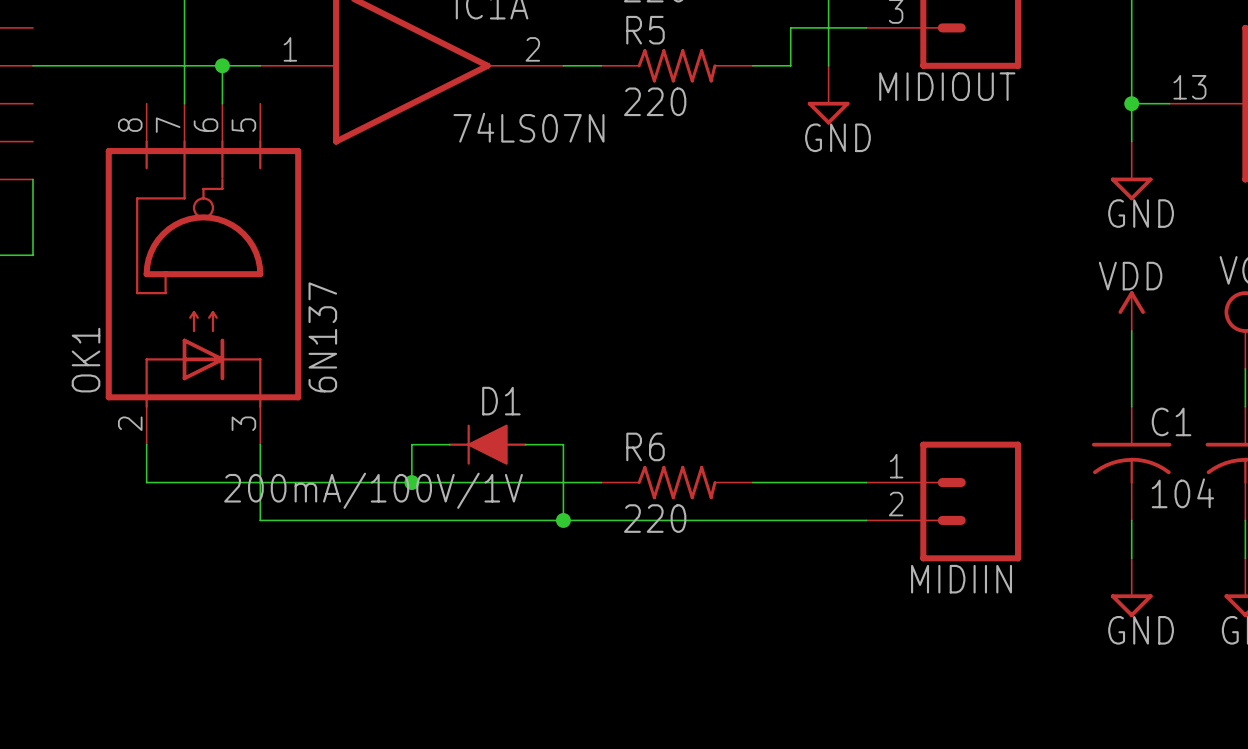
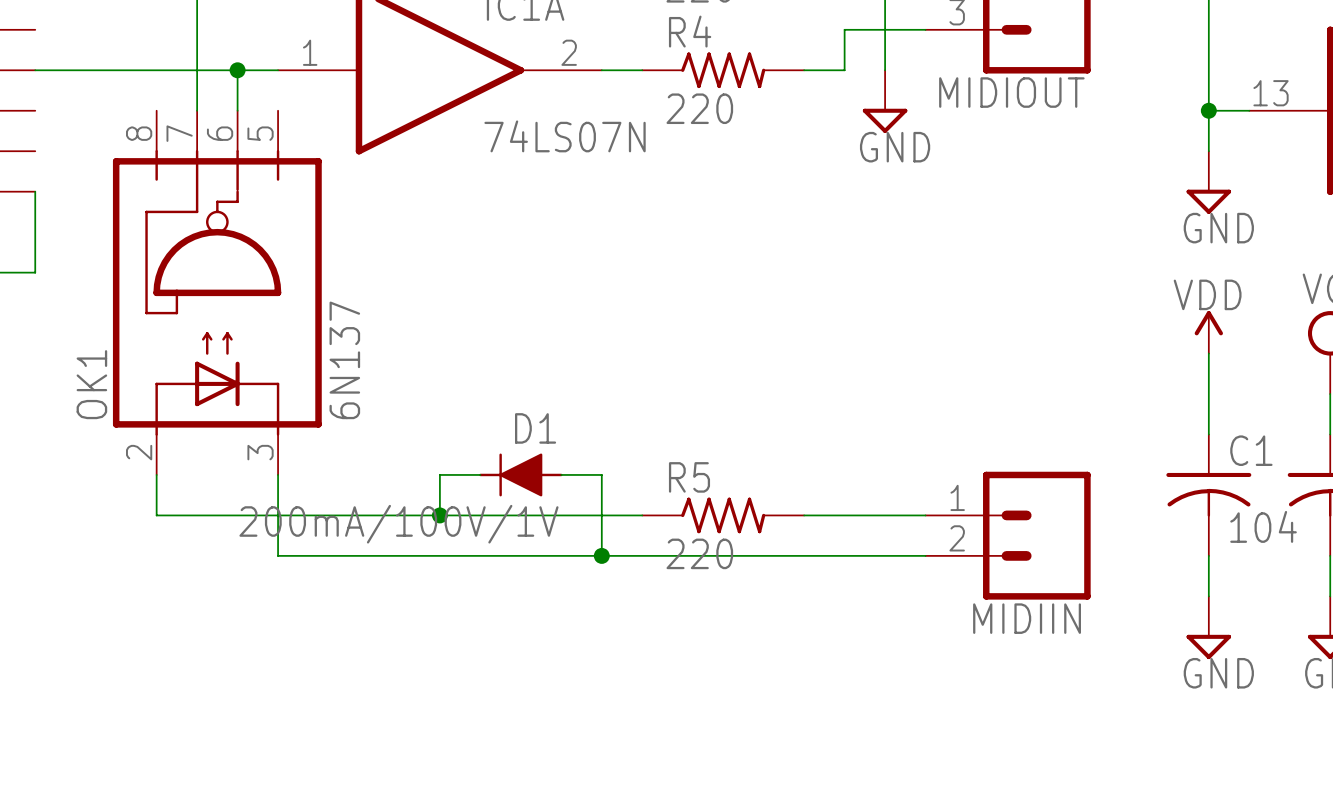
R5 name: R5 (645, 30) -> R4 (690, 31)
R6 name: R6 (645, 446) -> R5 (689, 477)

